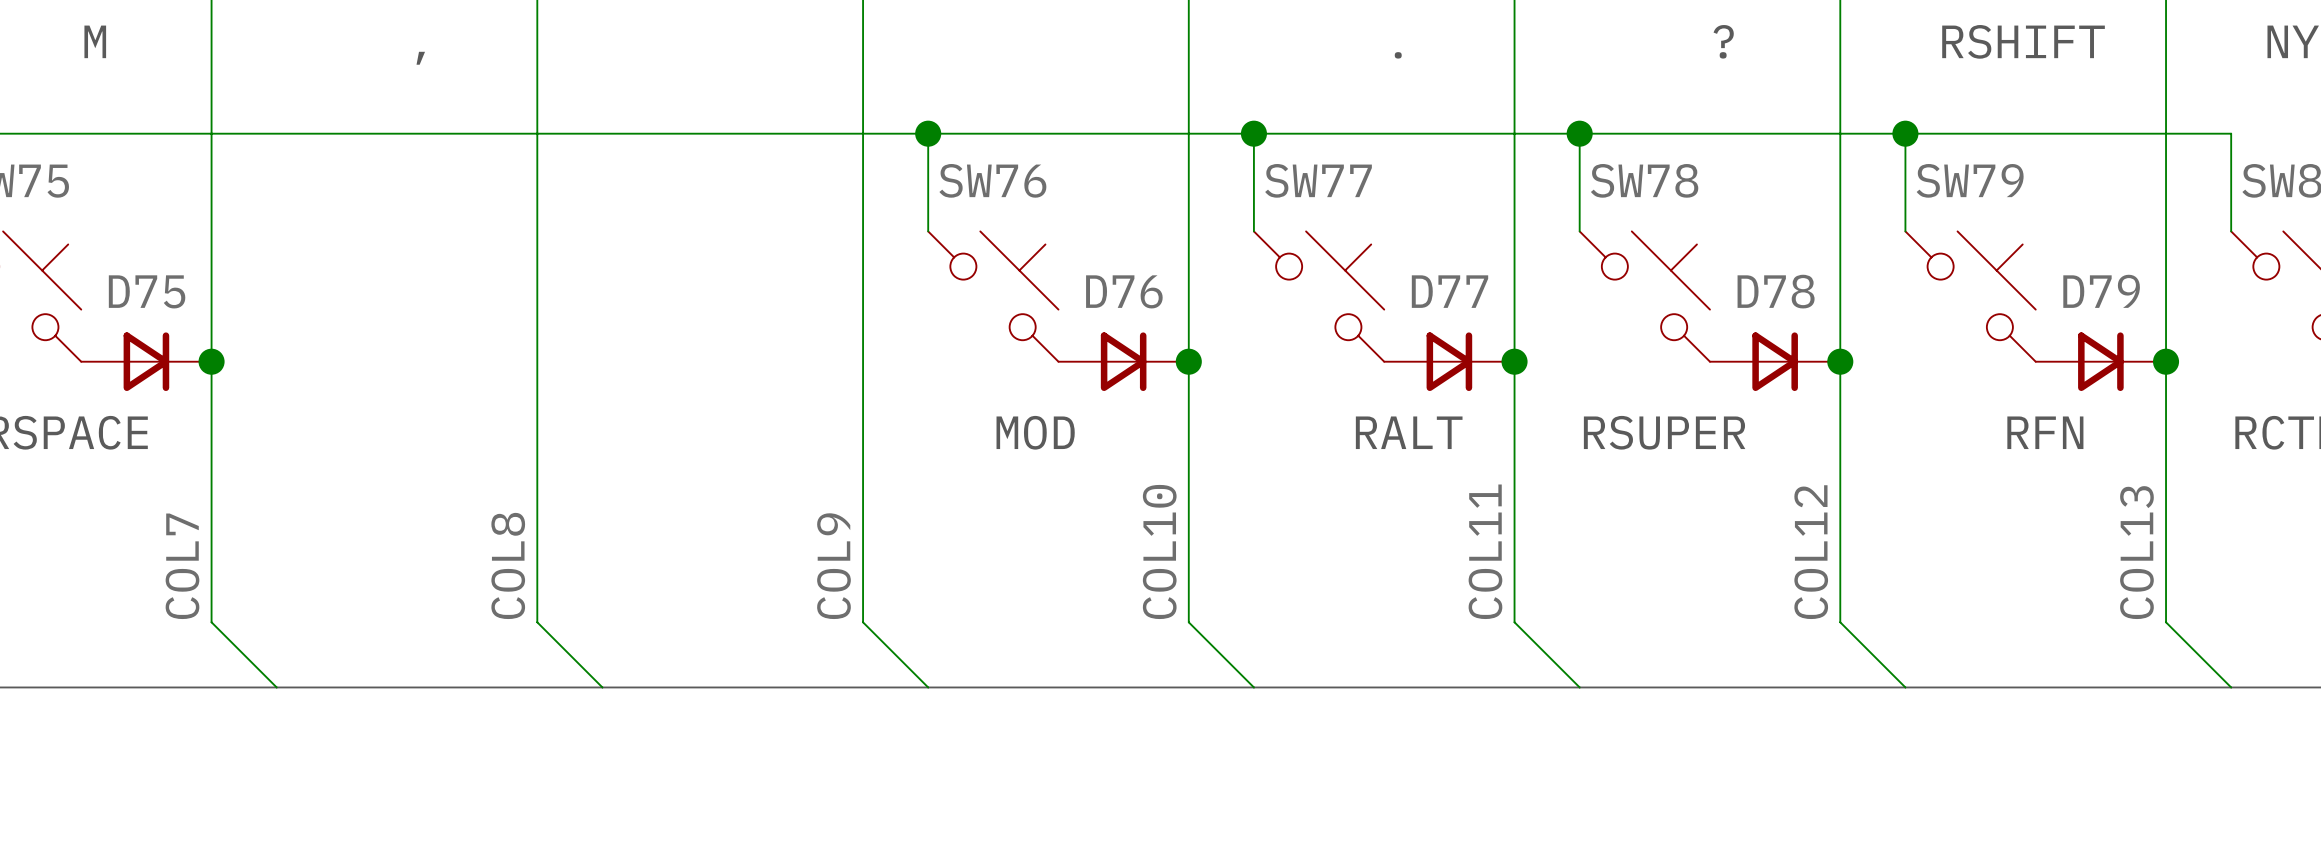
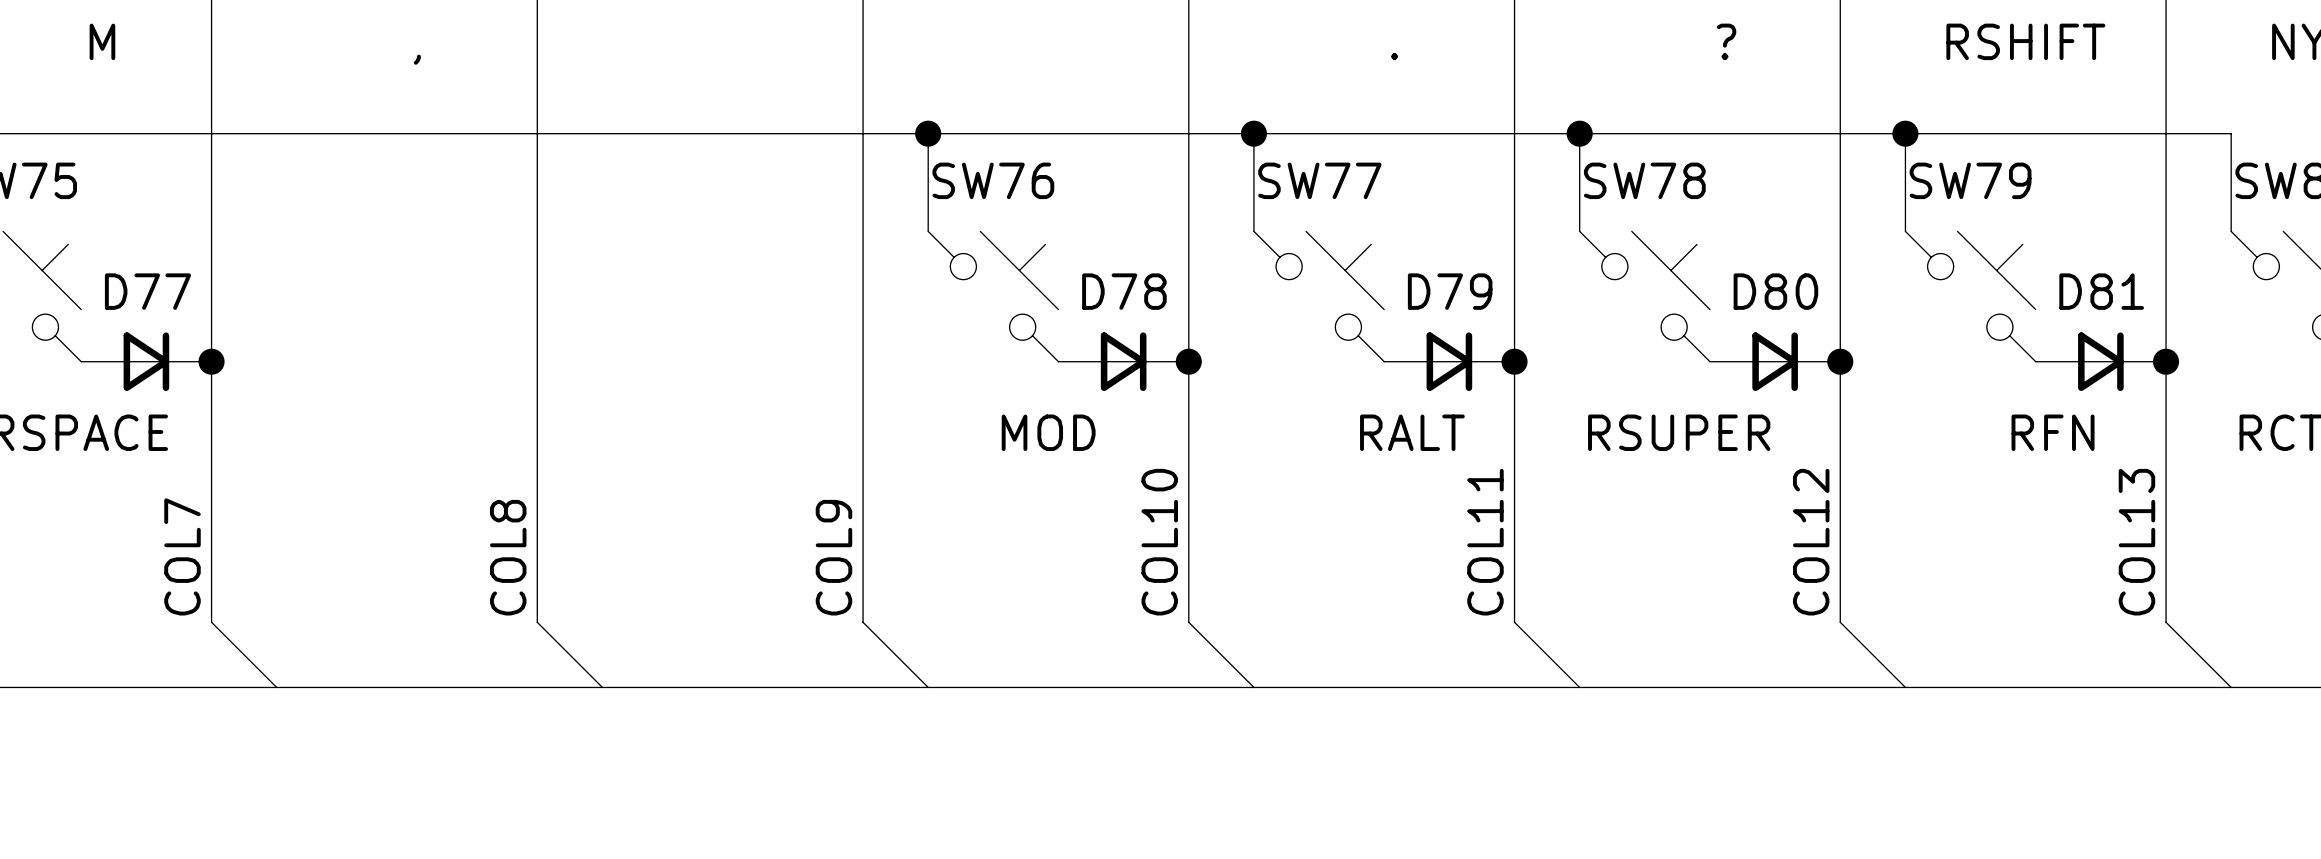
D75 name: D75 (147, 291) -> D77 (147, 291)
D76 name: D76 (1124, 291) -> D78 (1124, 291)
D77 name: D77 (1449, 291) -> D79 (1450, 291)
D78 name: D78 (1776, 291) -> D80 (1775, 291)
D79 name: D79 (2101, 291) -> D81 (2101, 291)

